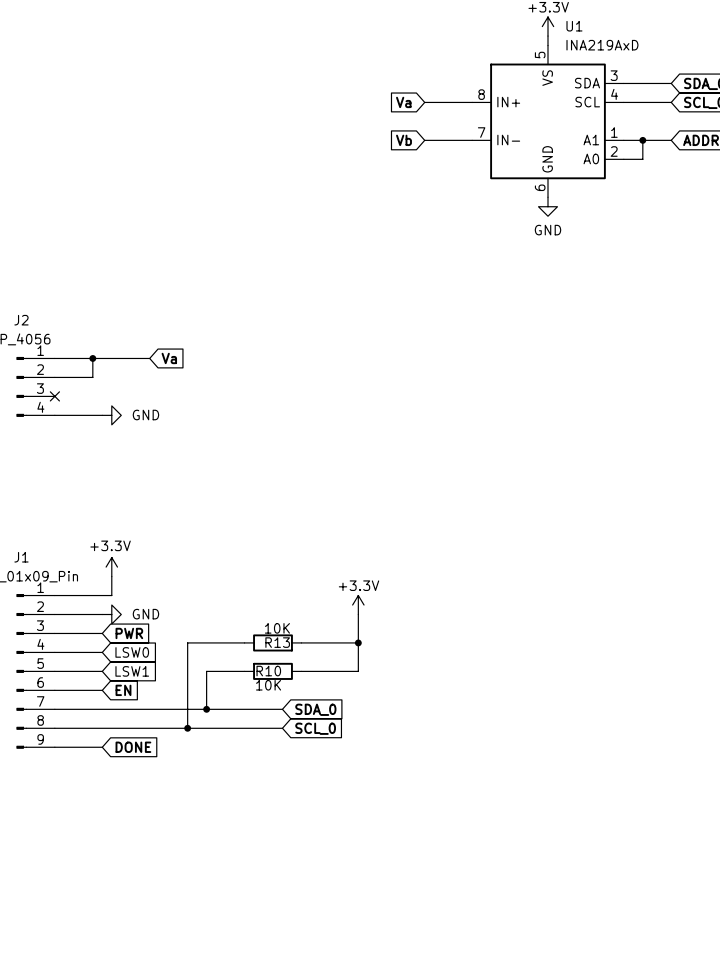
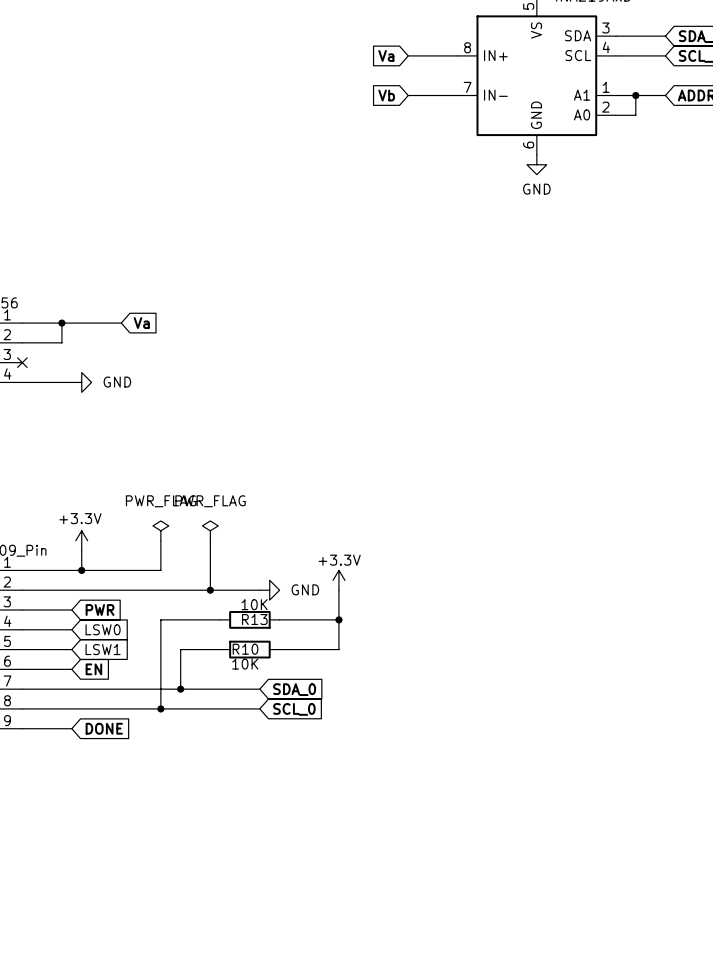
power symbol: none -> PWR_FLAG (160, 530)
power symbol: none -> PWR_FLAG (210, 530)
wire: none -> (160, 540) (160, 570) (81, 570)
wire: none -> (210, 540) (210, 590)
junction: none -> (81, 570)
wire: none -> (71, 590) (259, 590)
power symbol position: GND (111, 614) -> GND (269, 590)
junction: none -> (210, 590)

